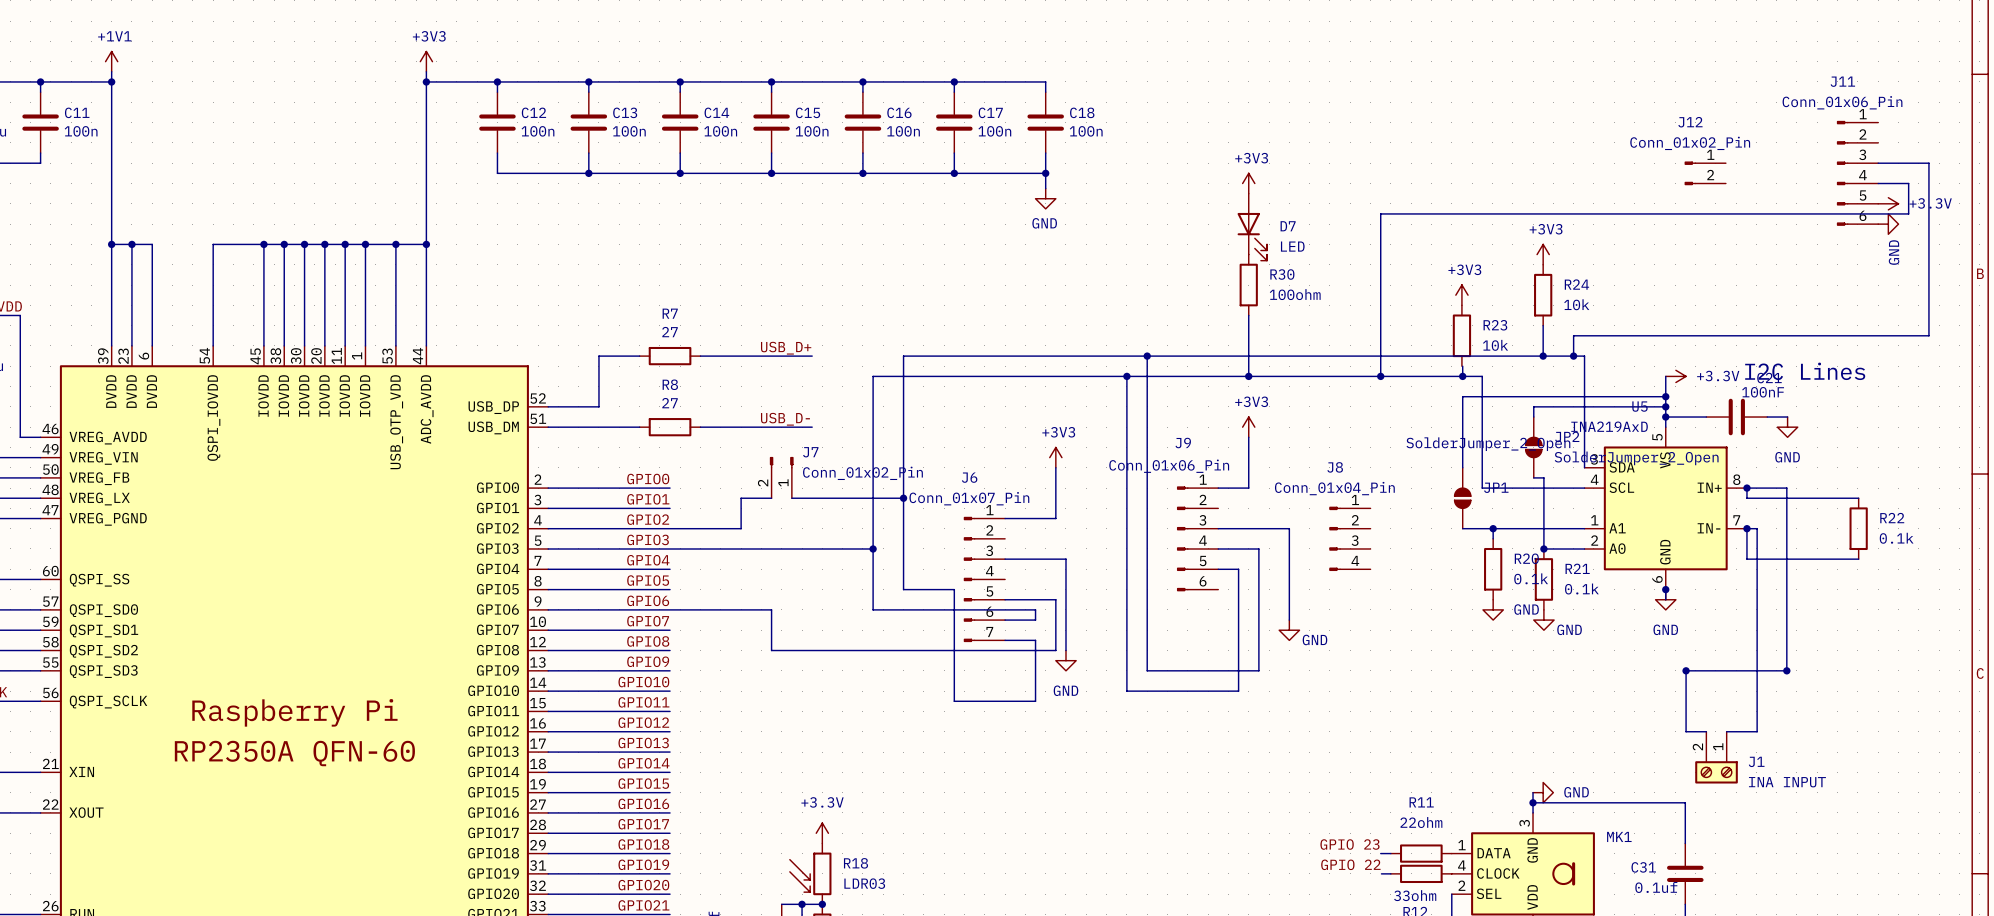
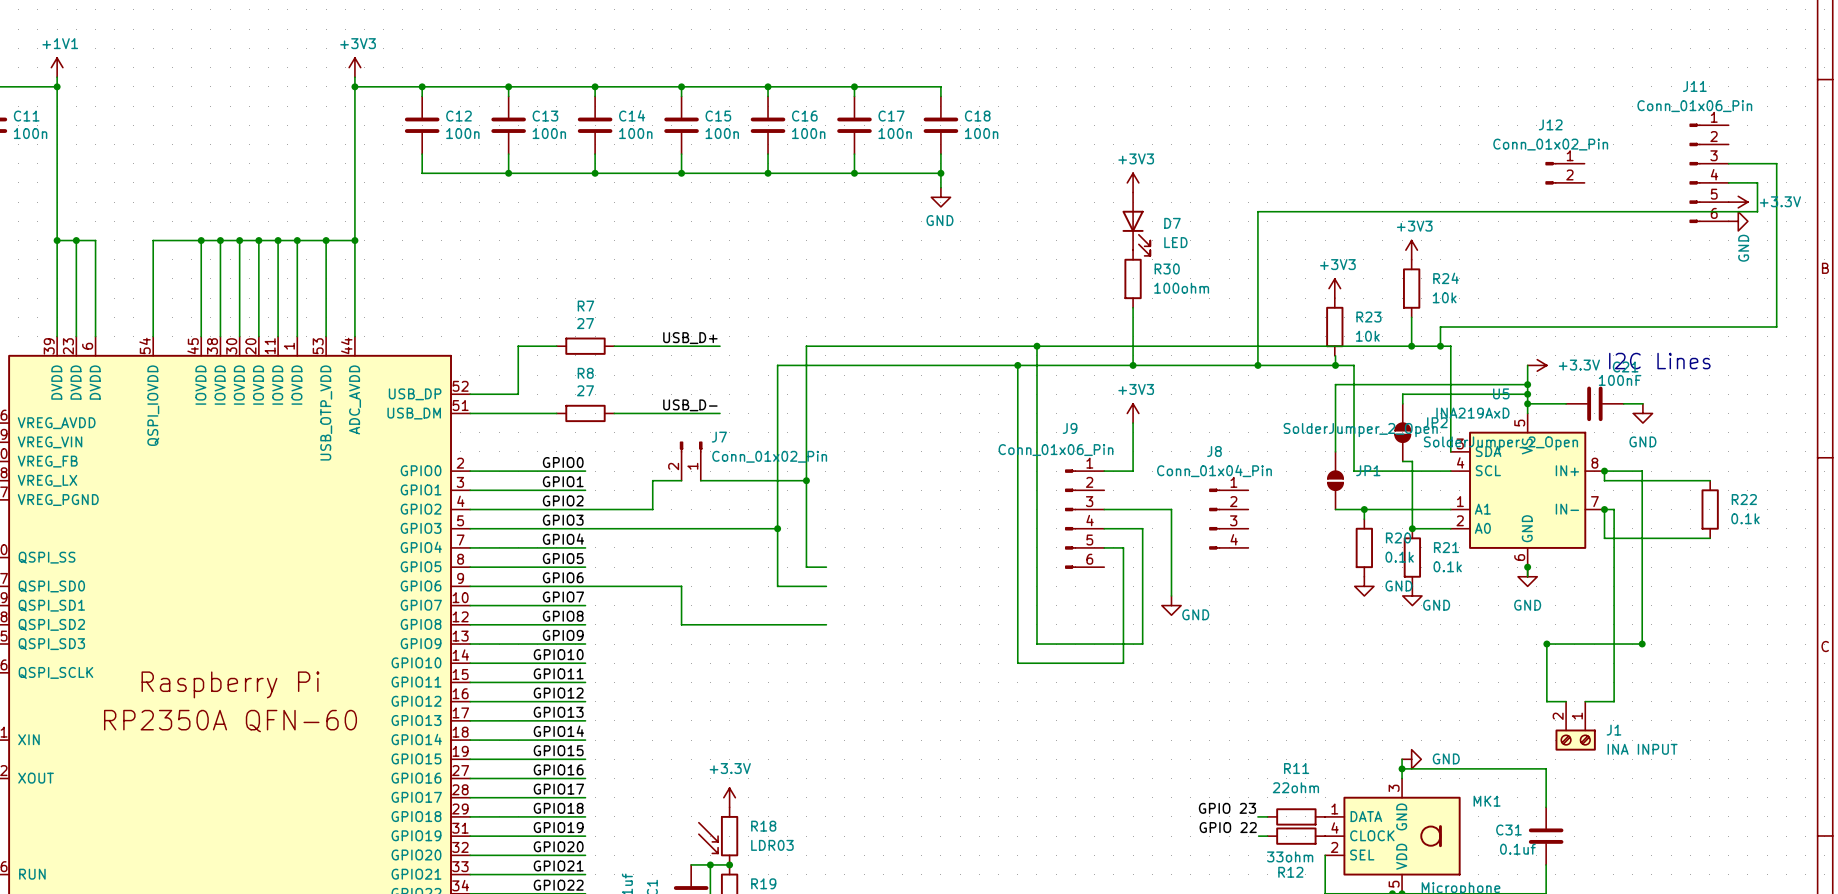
power symbol: +3V3 (1055, 457) -> none
wire: (1055, 467) (1055, 518) (1005, 518) -> none
wire: (1005, 559) (1065, 559) (1065, 650) -> none
J6: Conn_01x07_Pin (984, 579) -> none
wire: (924, 589) (954, 589) (954, 701) (1035, 701) (1035, 640) (1005, 640) -> none
wire: (1005, 599) (1055, 599) (1055, 650) (924, 650) -> none
wire: (924, 609) (1035, 609) (1035, 620) (1005, 620) -> none
power symbol: GND (1065, 660) -> none

